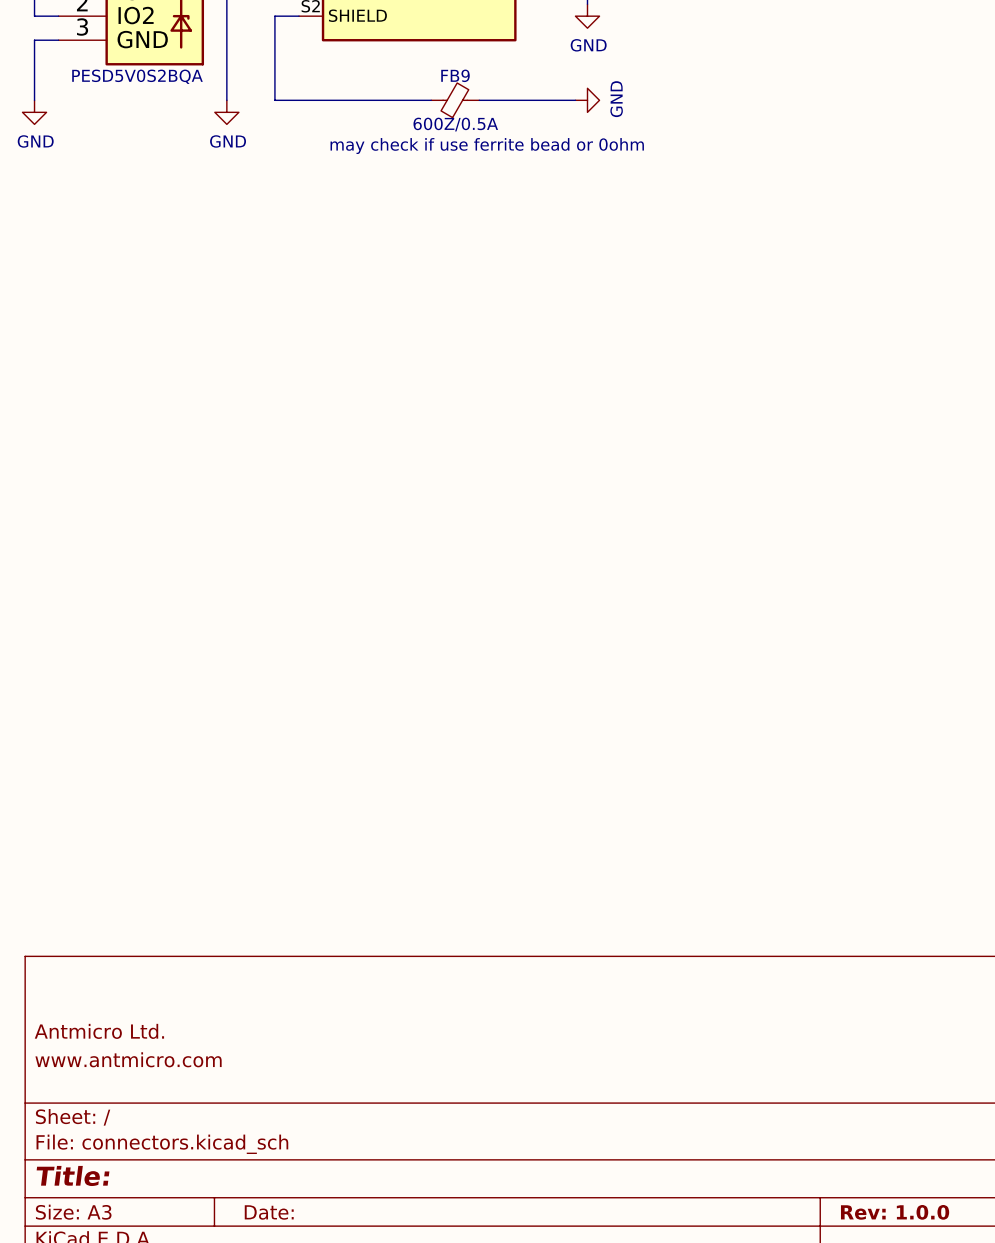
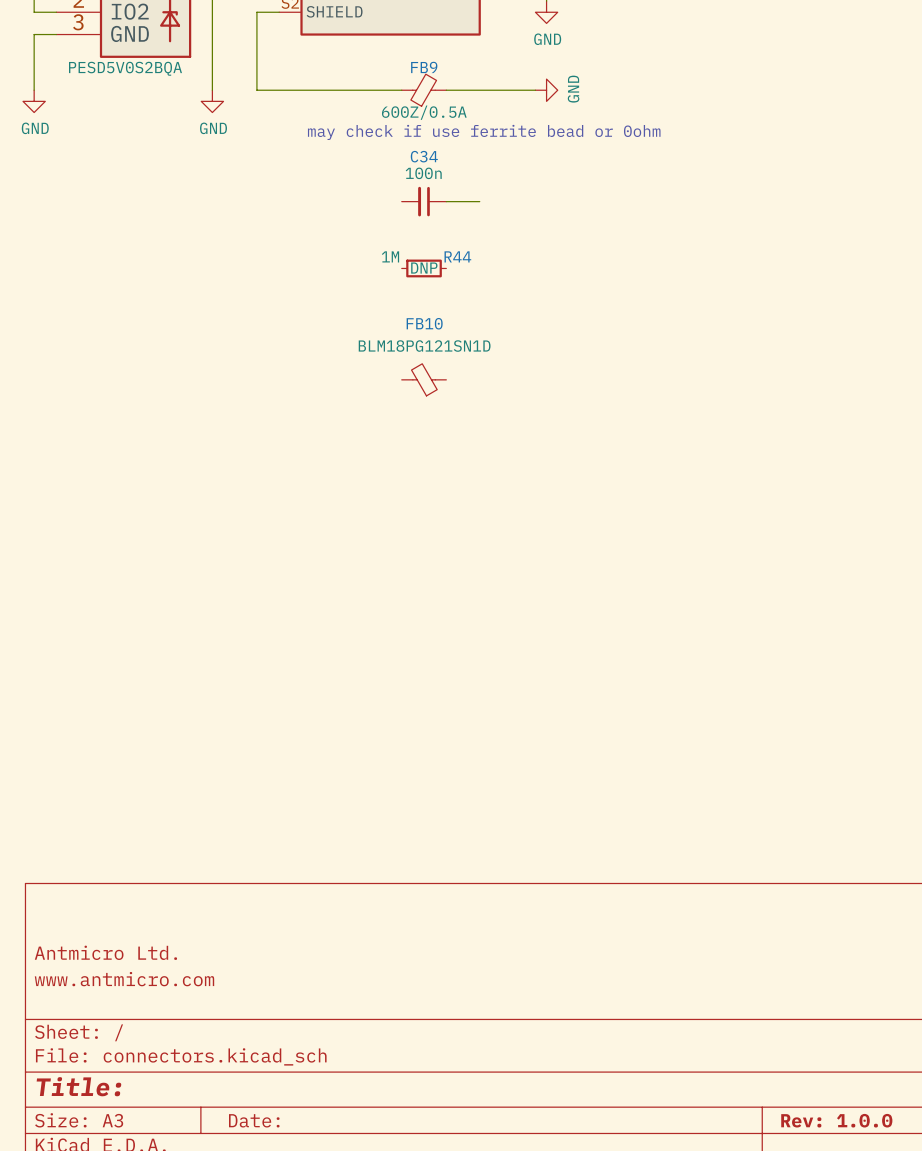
C34: none -> (424, 201)
wire: none -> (446, 201) (479, 201)
R44: none -> (424, 268)
FB10: none -> (424, 379)

